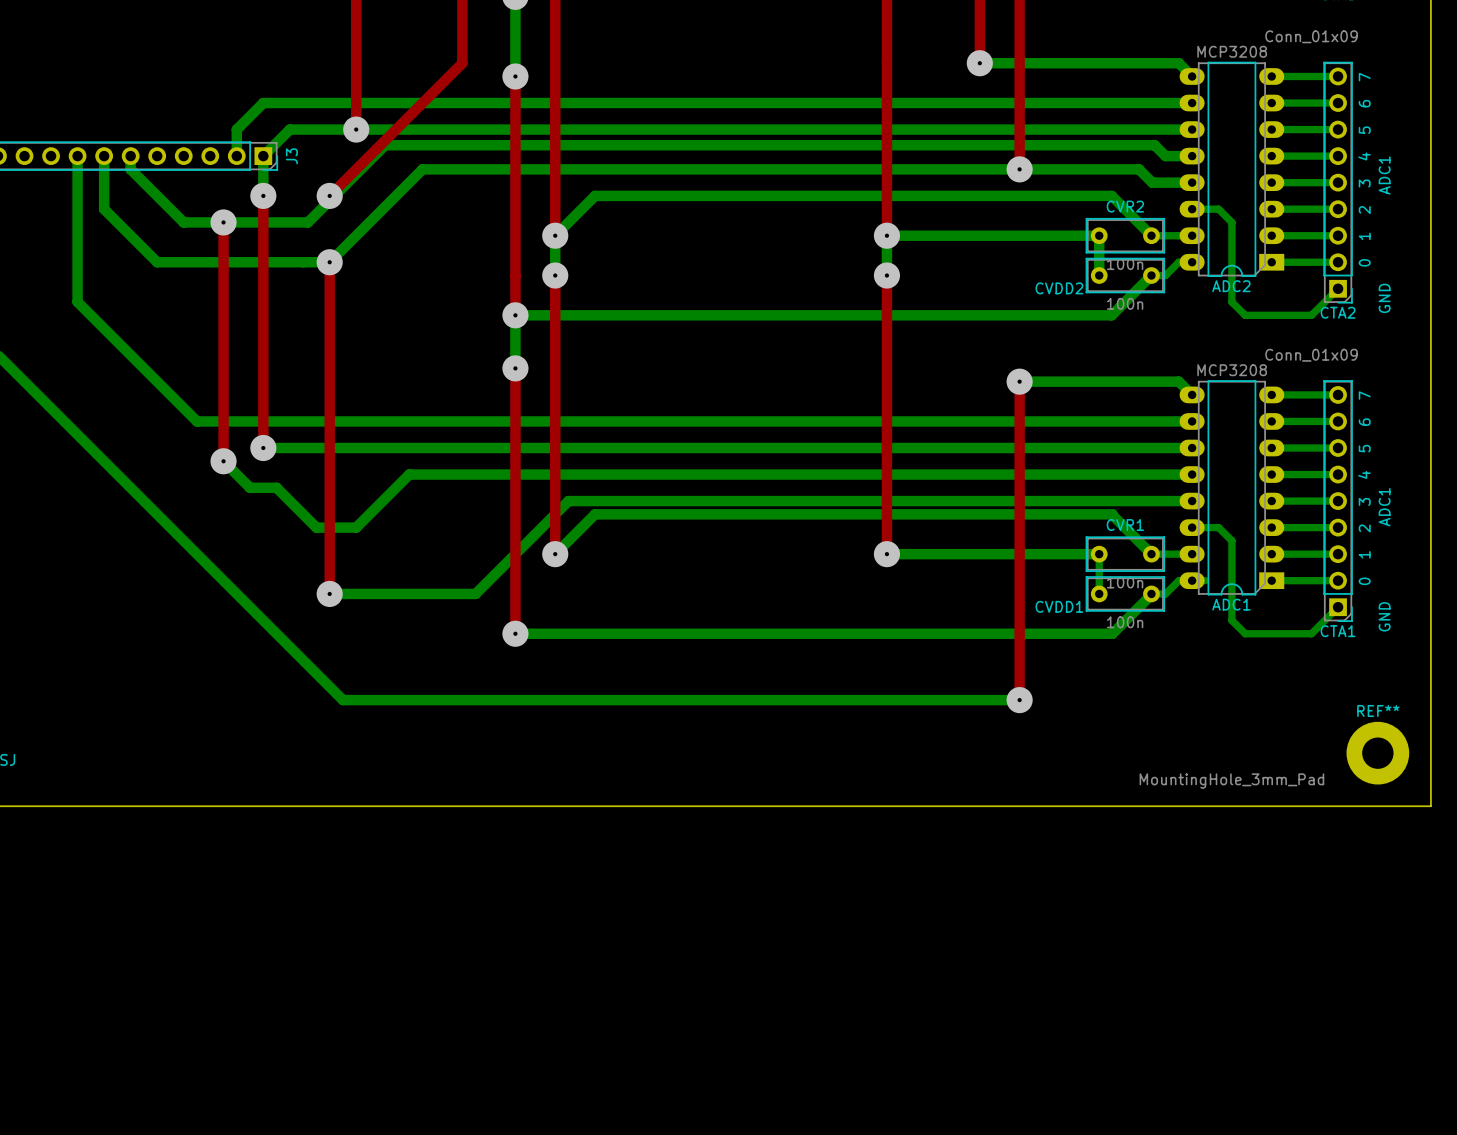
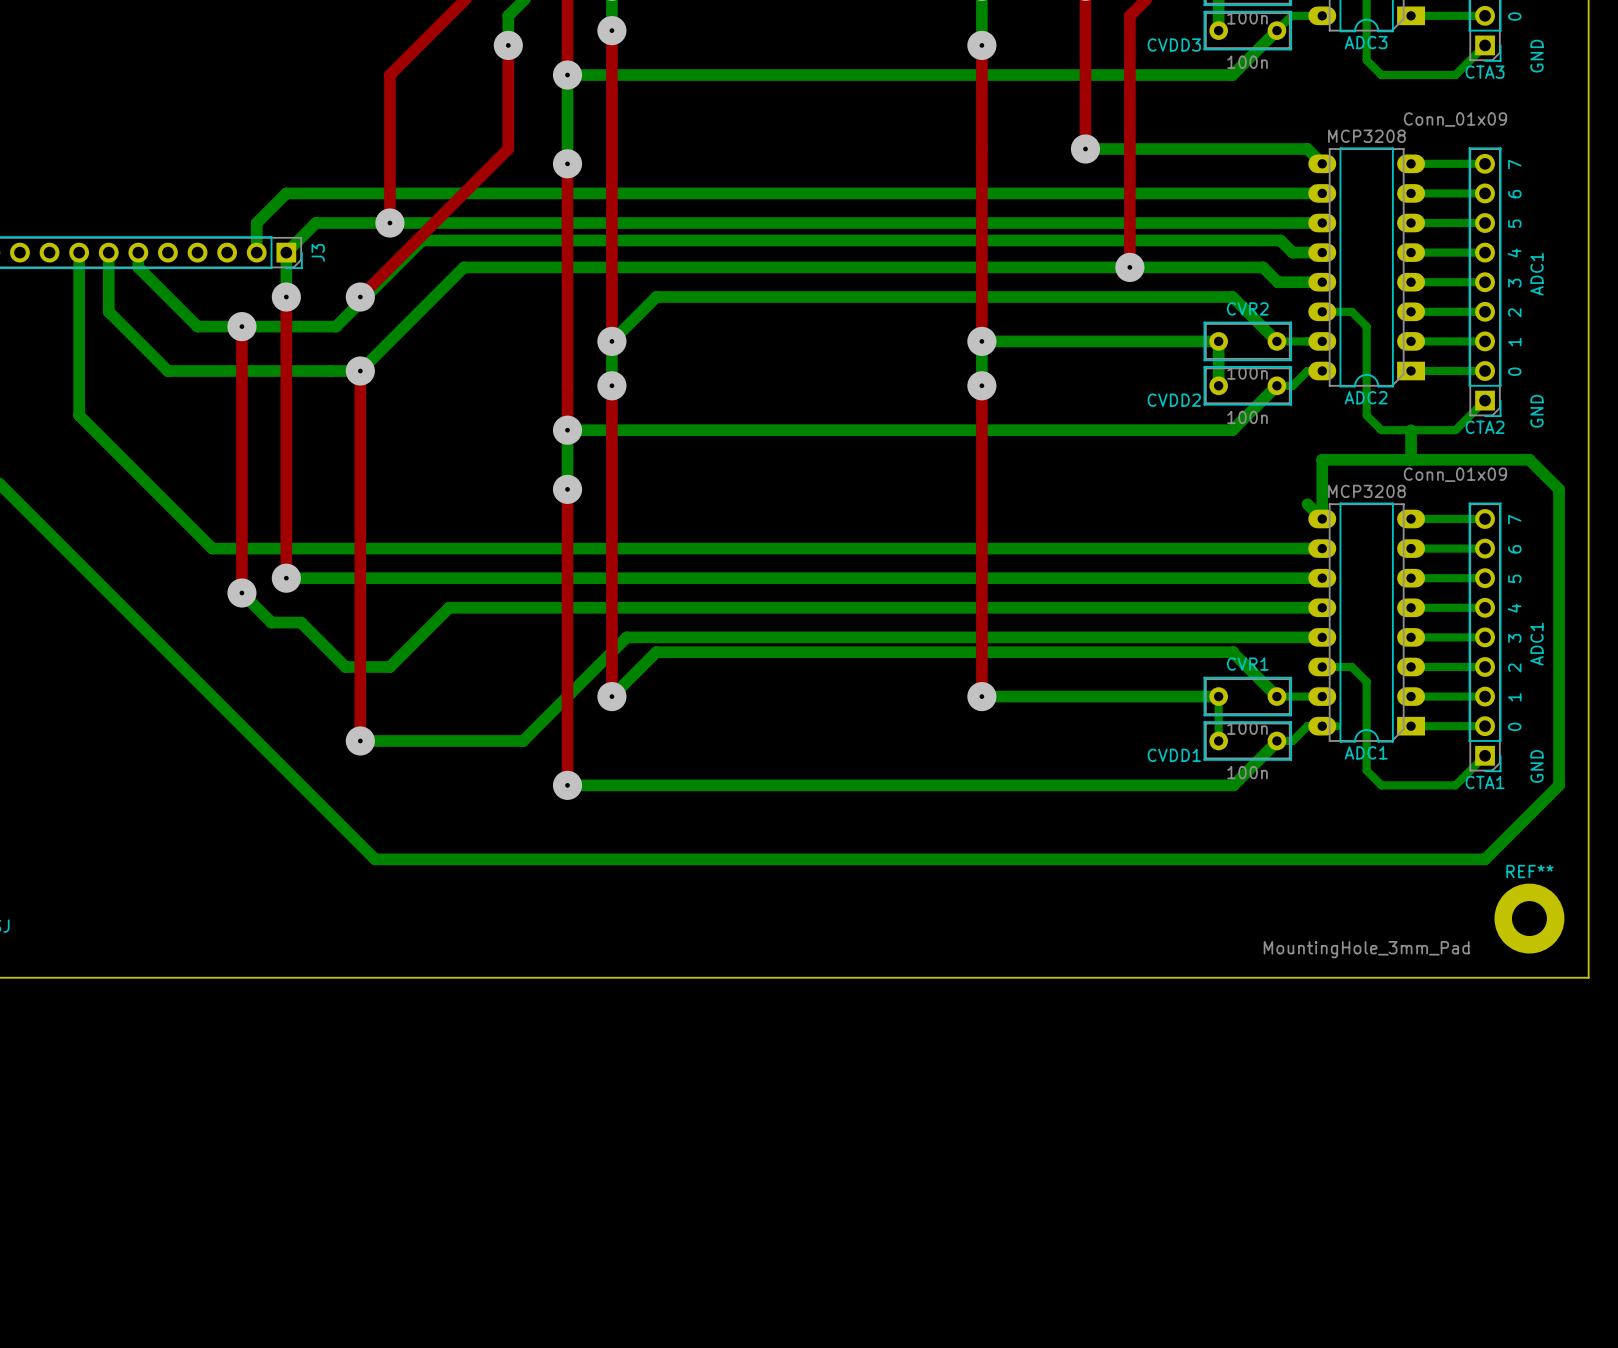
bottom track: none -> (1411, 430) (1411, 459)
top track: (1019, 381) (1019, 700) -> none
bottom track: (1019, 381) (1178, 381) -> none
via: (1019, 381) -> none
bottom track: none -> (1322, 518) (1322, 459) (1529, 459) (1559, 489) (1559, 785) (1485, 859) (1129, 859)
via: (1019, 700) -> none

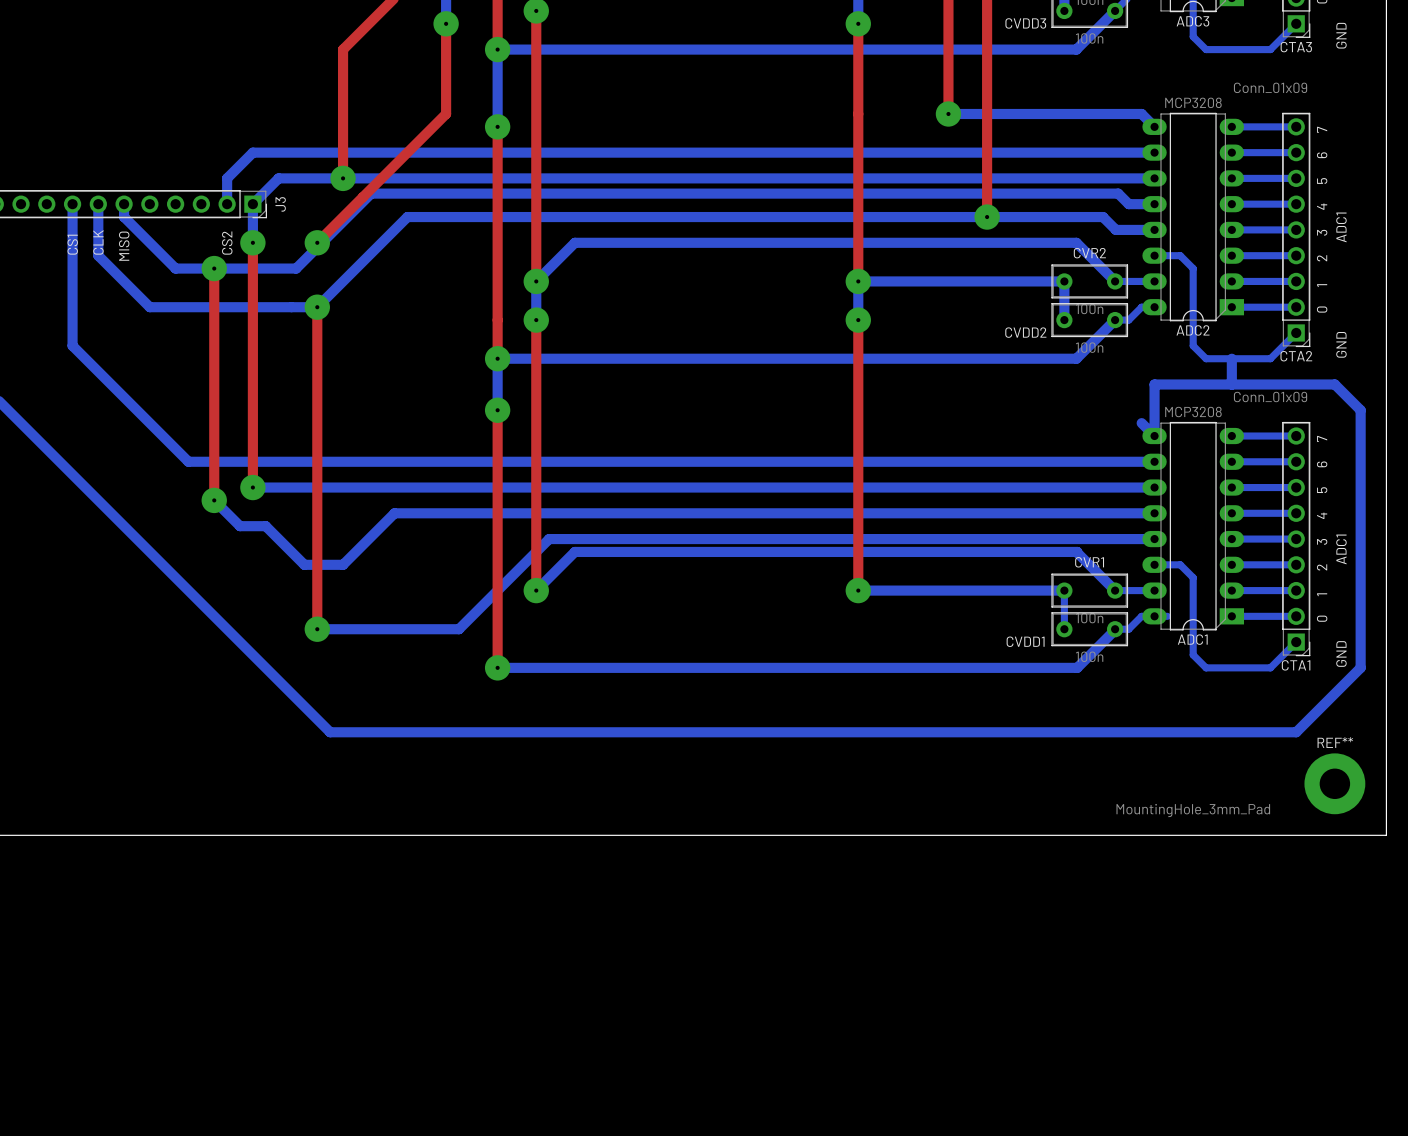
text: none -> CS1 (72, 244)
text: none -> CS2 (227, 243)
text: none -> CLK (98, 242)
text: none -> MISO (124, 246)

